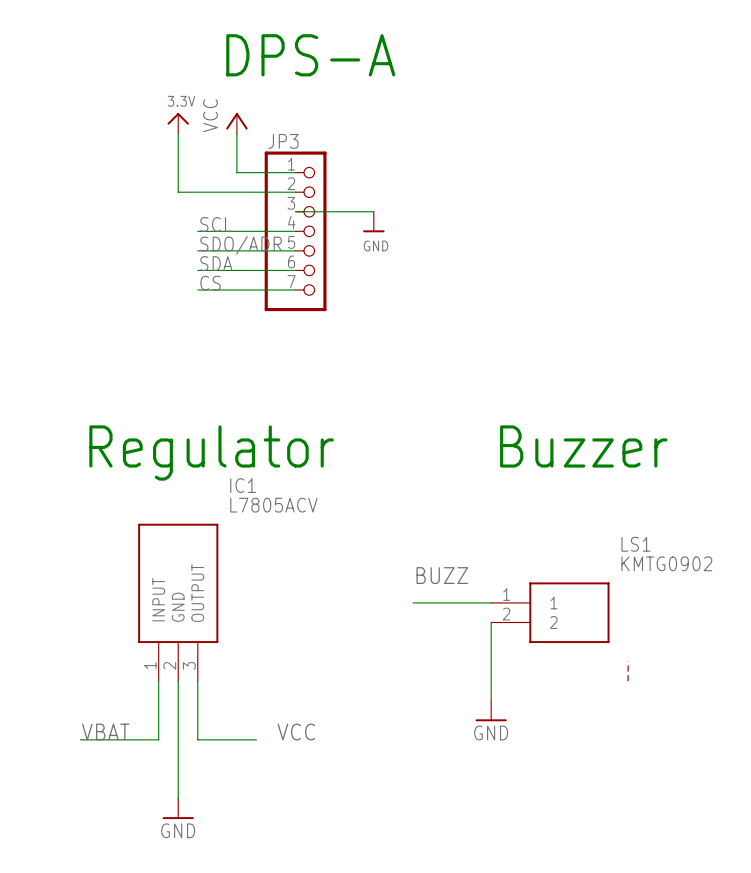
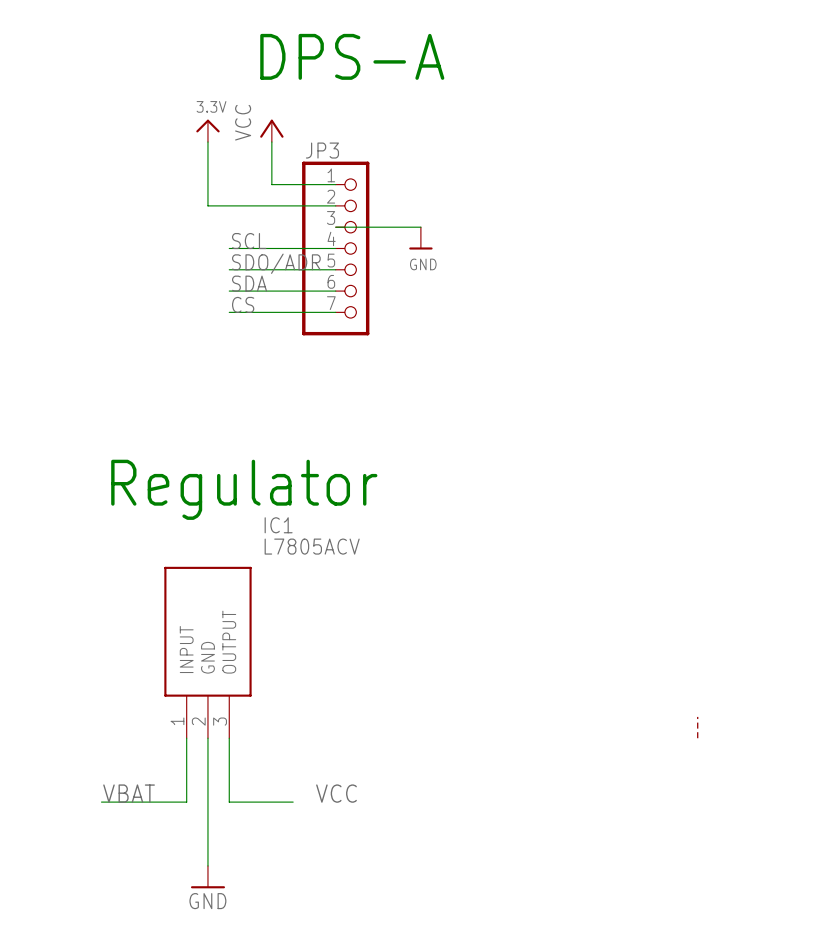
text: Buzzer (583, 446) -> none
label: BUZZ (442, 575) -> none
wire: (412, 602) (491, 602) -> none
LS1: KMTG0902 (550, 612) -> none
wire: (491, 622) (491, 700) -> none
power symbol: GND (491, 711) -> none

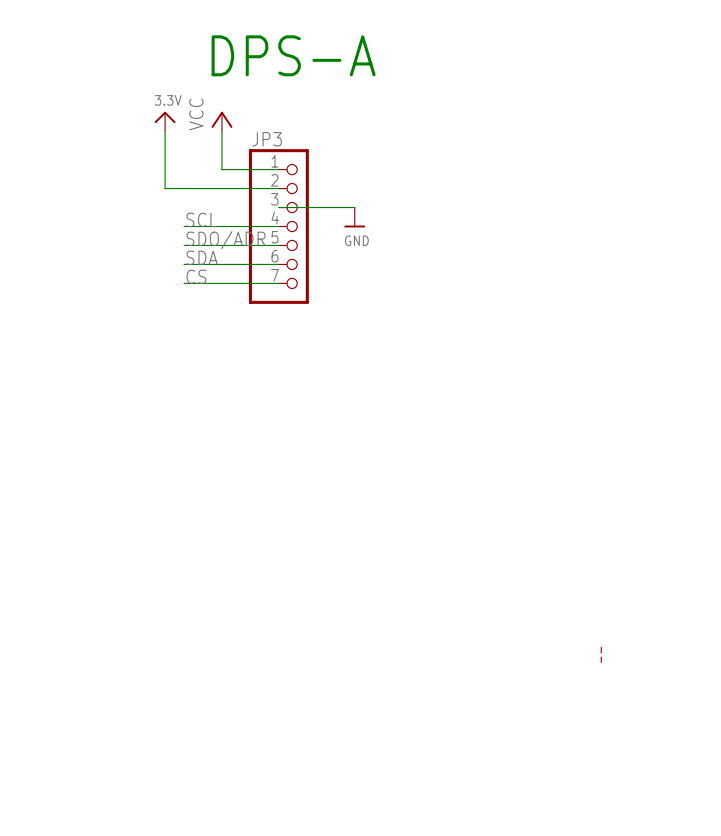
text: Regulator (244, 489) -> none
IC1: L7805ACV (207, 652) -> none
wire: (186, 738) (186, 802) (101, 802) -> none
wire: (207, 738) (207, 865) -> none
wire: (229, 738) (229, 802) (293, 802) -> none
label: VBAT (129, 793) -> none
label: VCC (336, 793) -> none
power symbol: GND (207, 877) -> none

